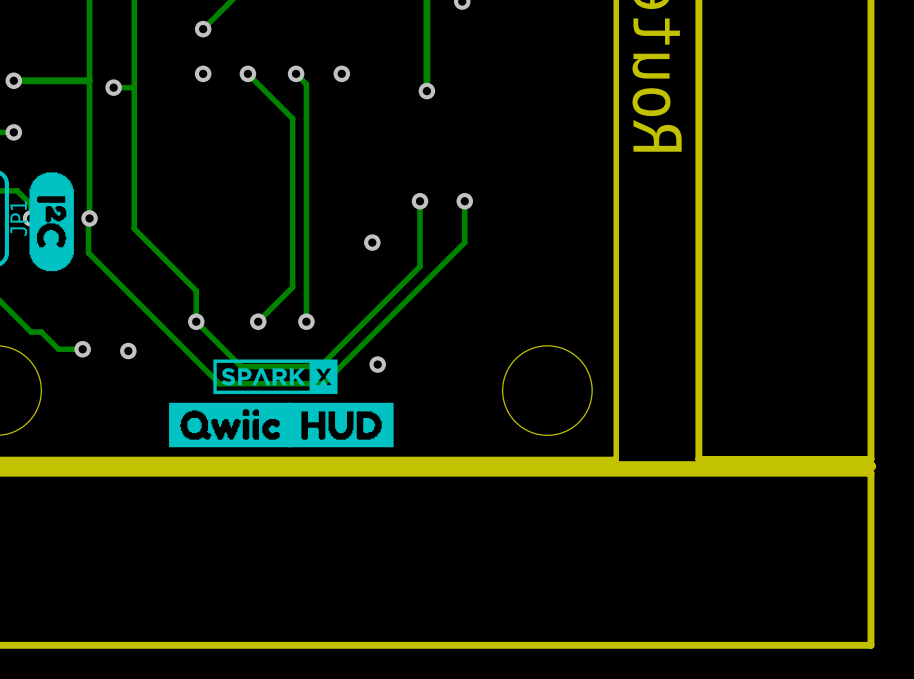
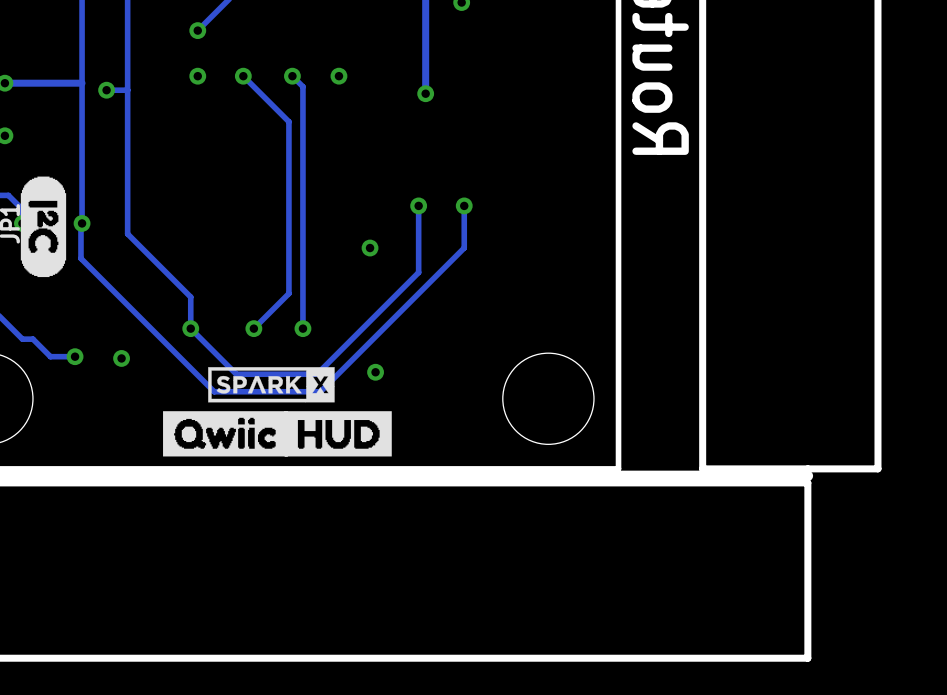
board edge: (870, 466) (802, 466) -> none
board edge: (802, 473) (870, 473) (870, 645) (802, 645) -> (807, 482) (807, 658)

